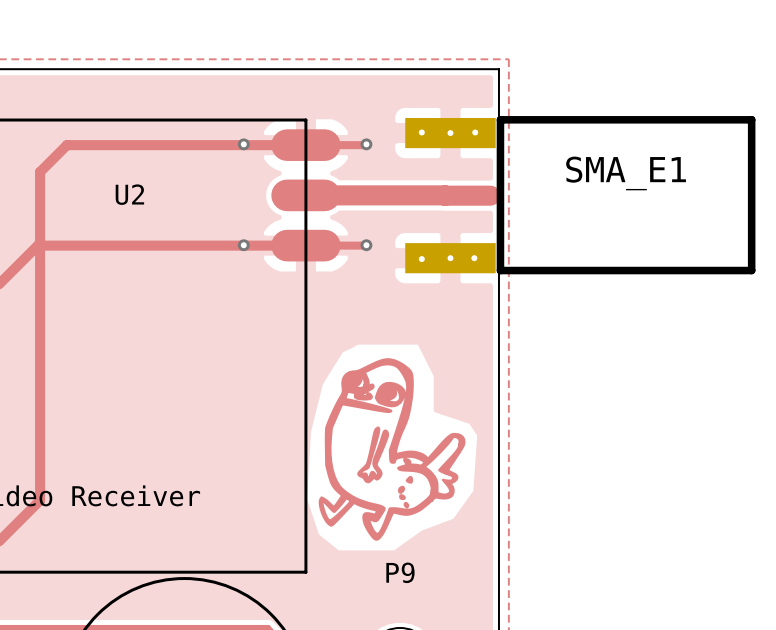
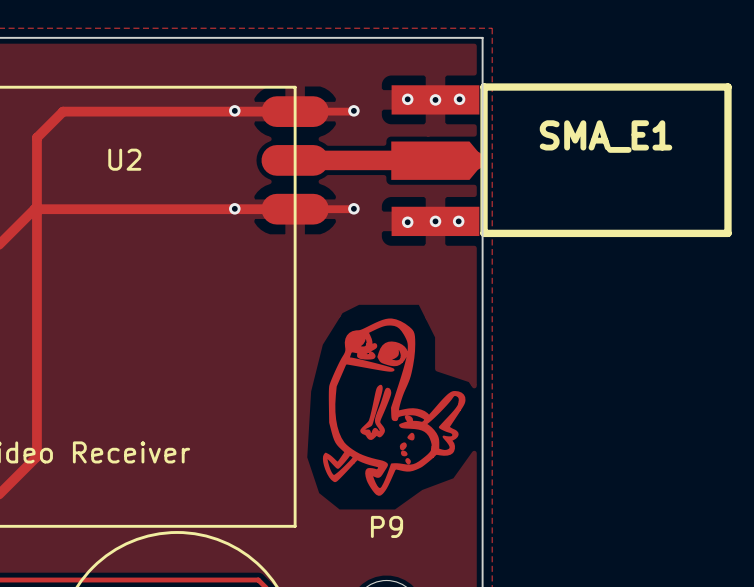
SMA_E1 footprint: [404, 116, 756, 275] -> [391, 83, 732, 238]
drawing position: (392, 449) -> (394, 407)

